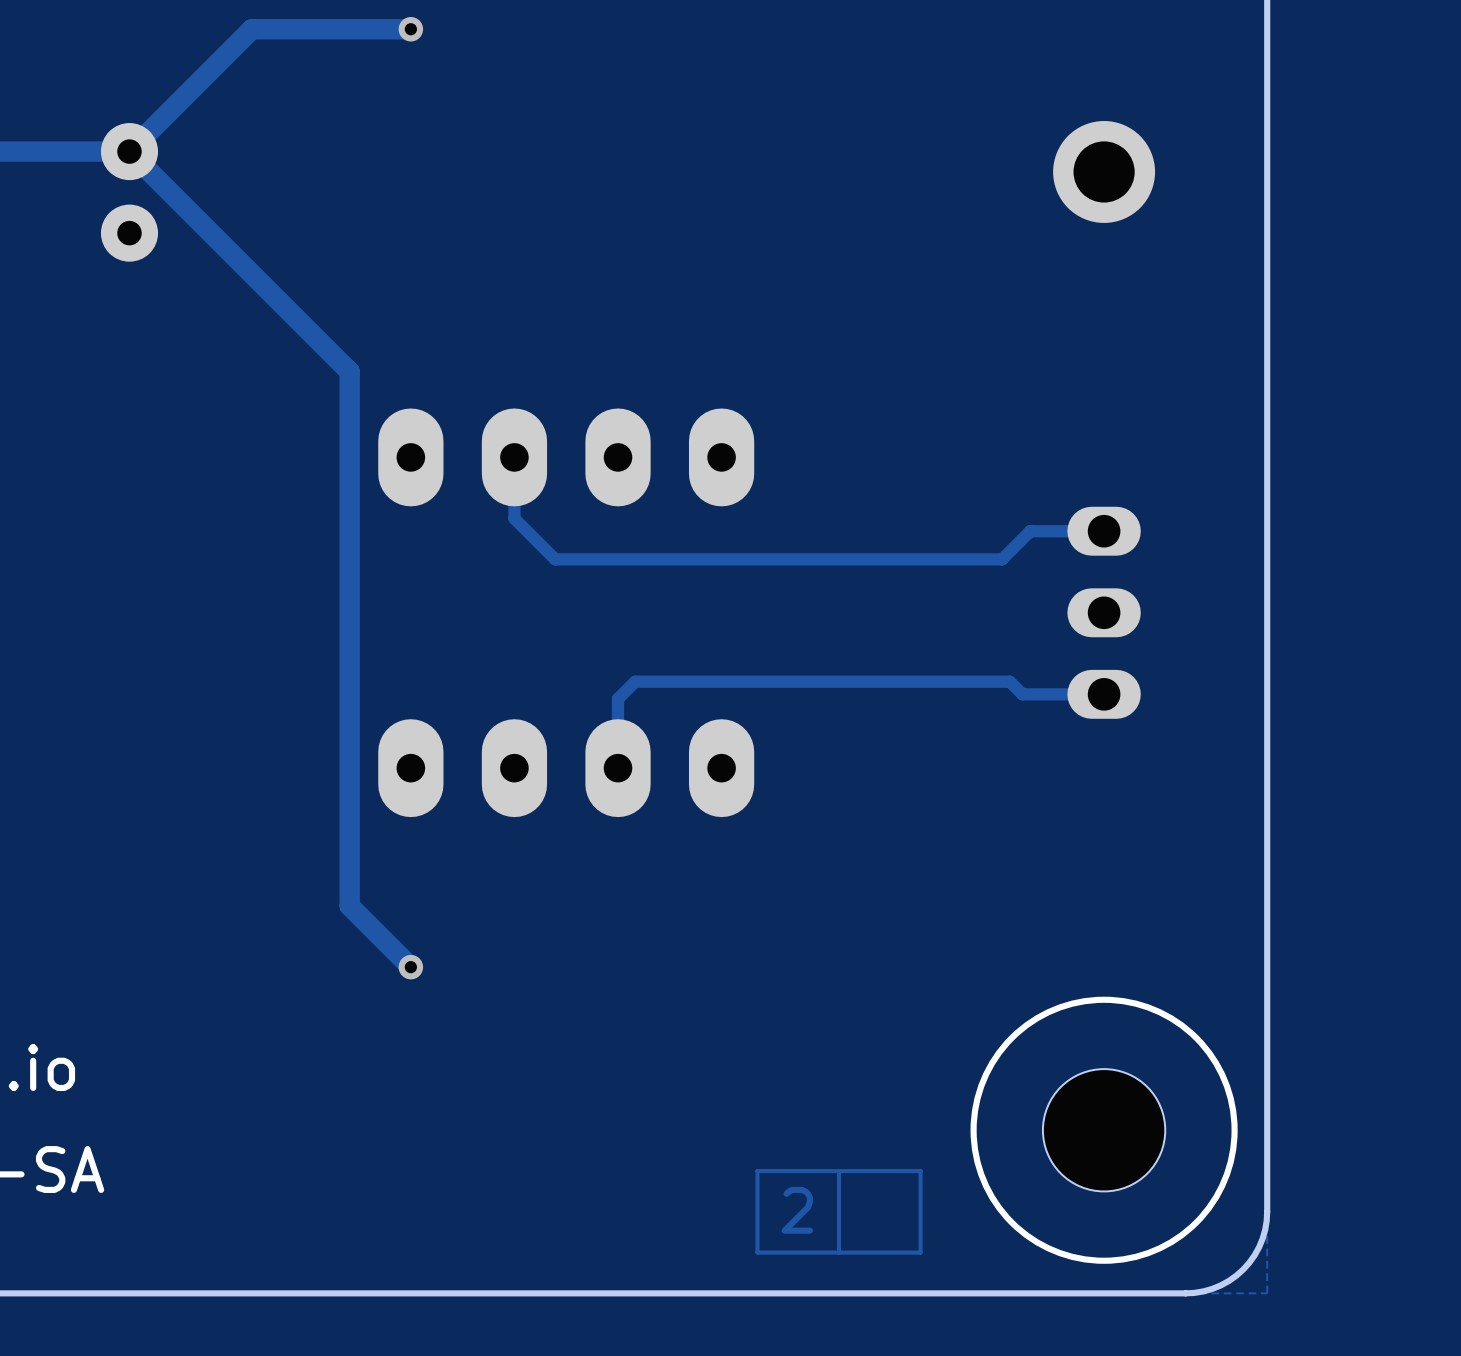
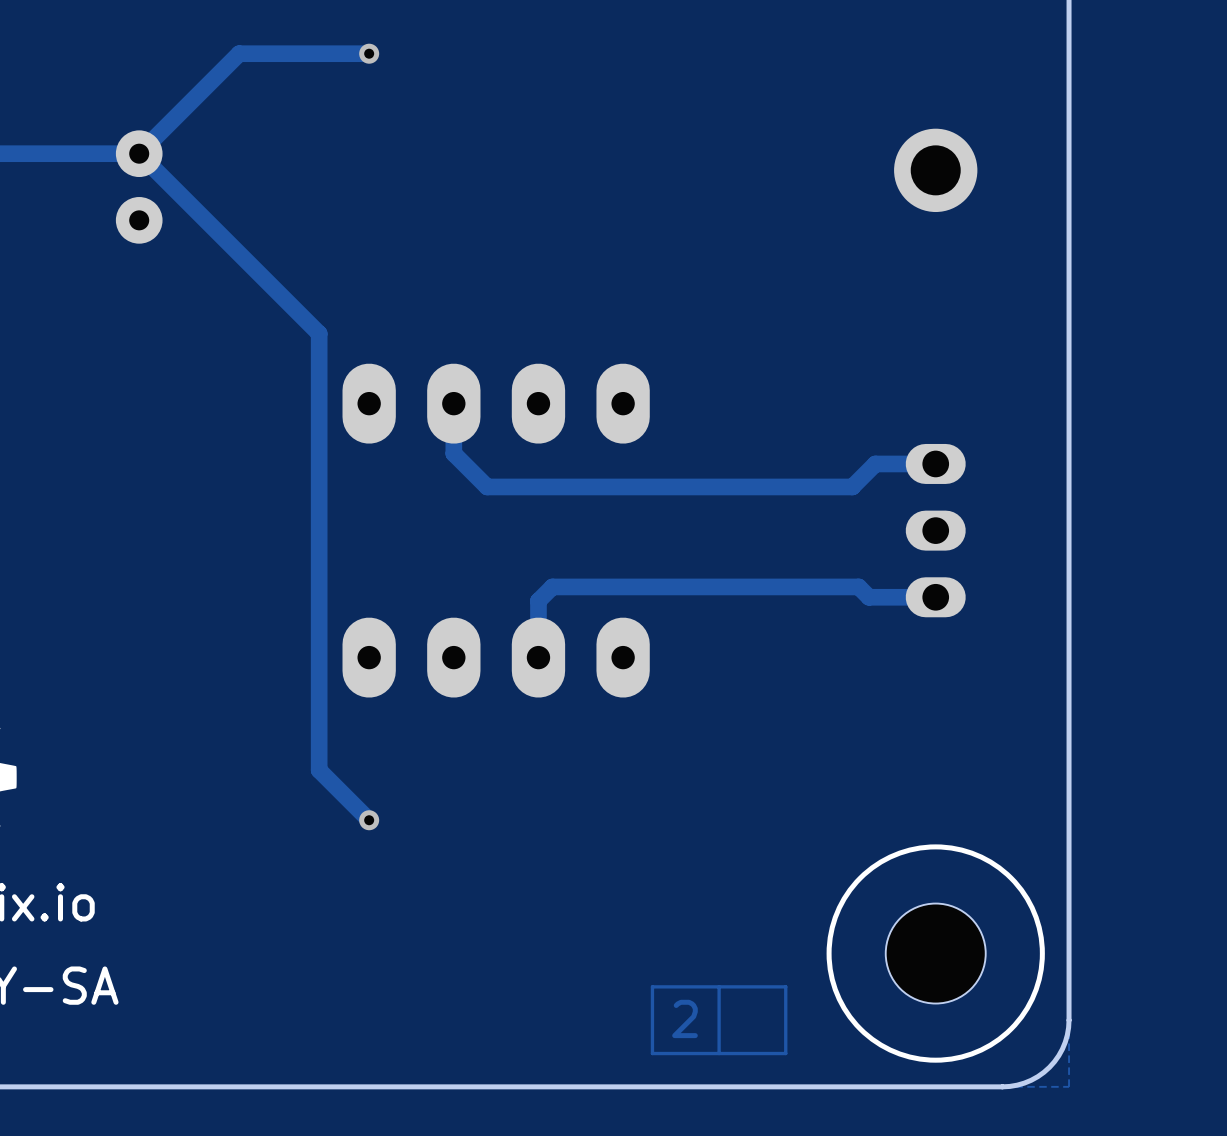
track width: thin (514, 457) (514, 518) (555, 559) (1002, 559) (1030, 531) (1104, 531) -> thick (453, 403) (453, 453) (487, 486) (852, 486) (875, 463) (935, 463)
track width: thin (1104, 694) (1022, 694) (1009, 681) (635, 681) (618, 698) (618, 768) -> thick (935, 597) (869, 597) (858, 586) (552, 586) (538, 600) (538, 657)

